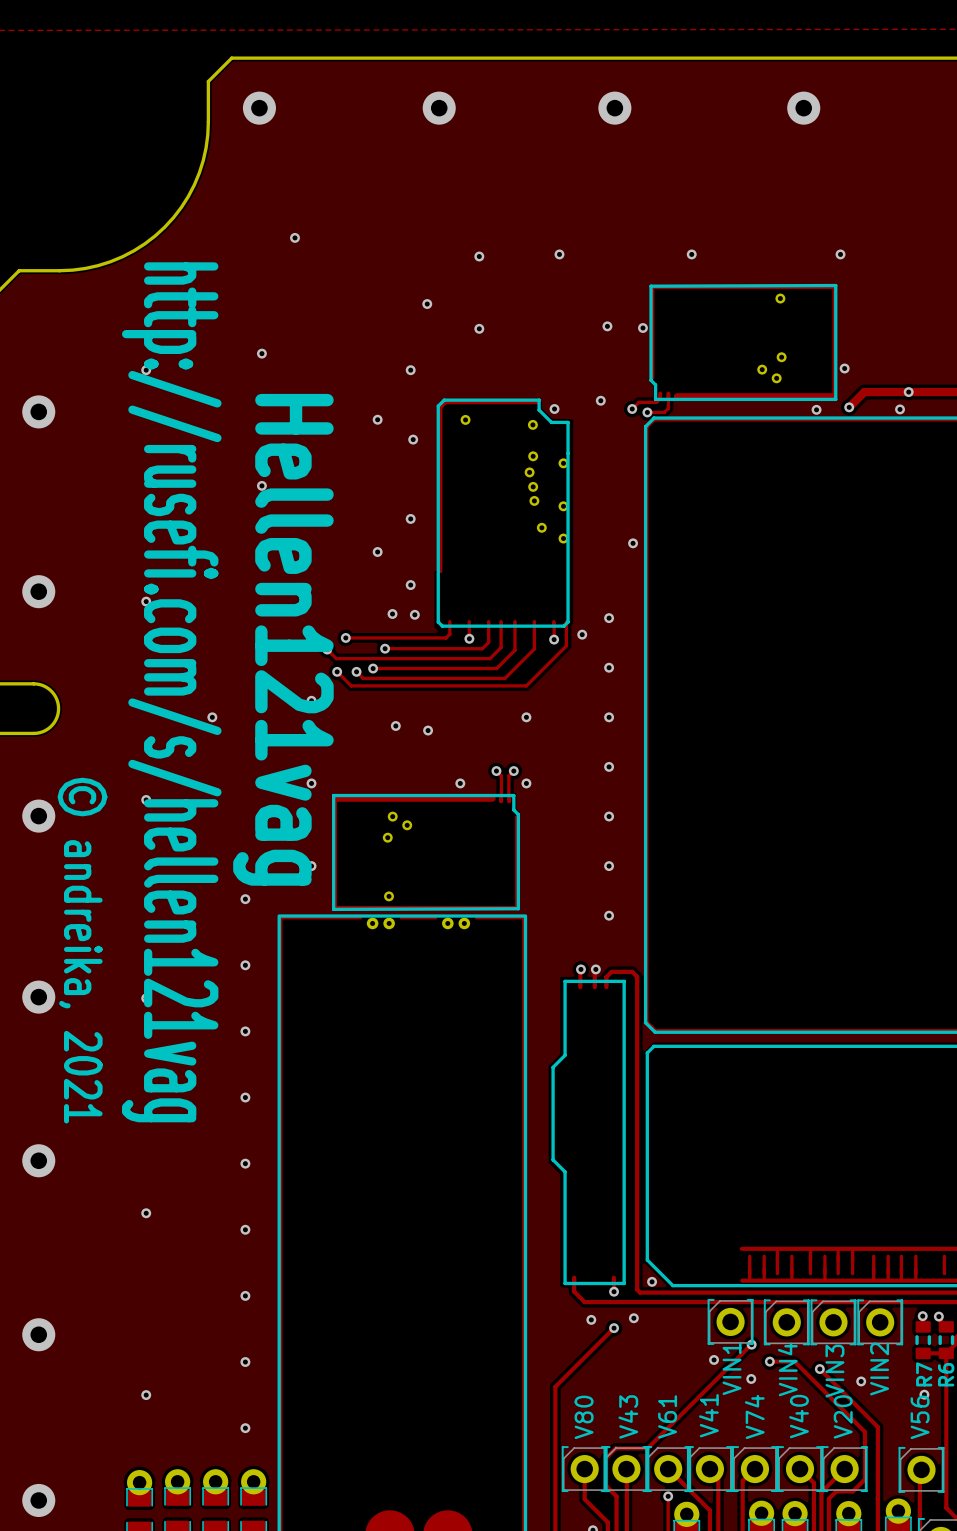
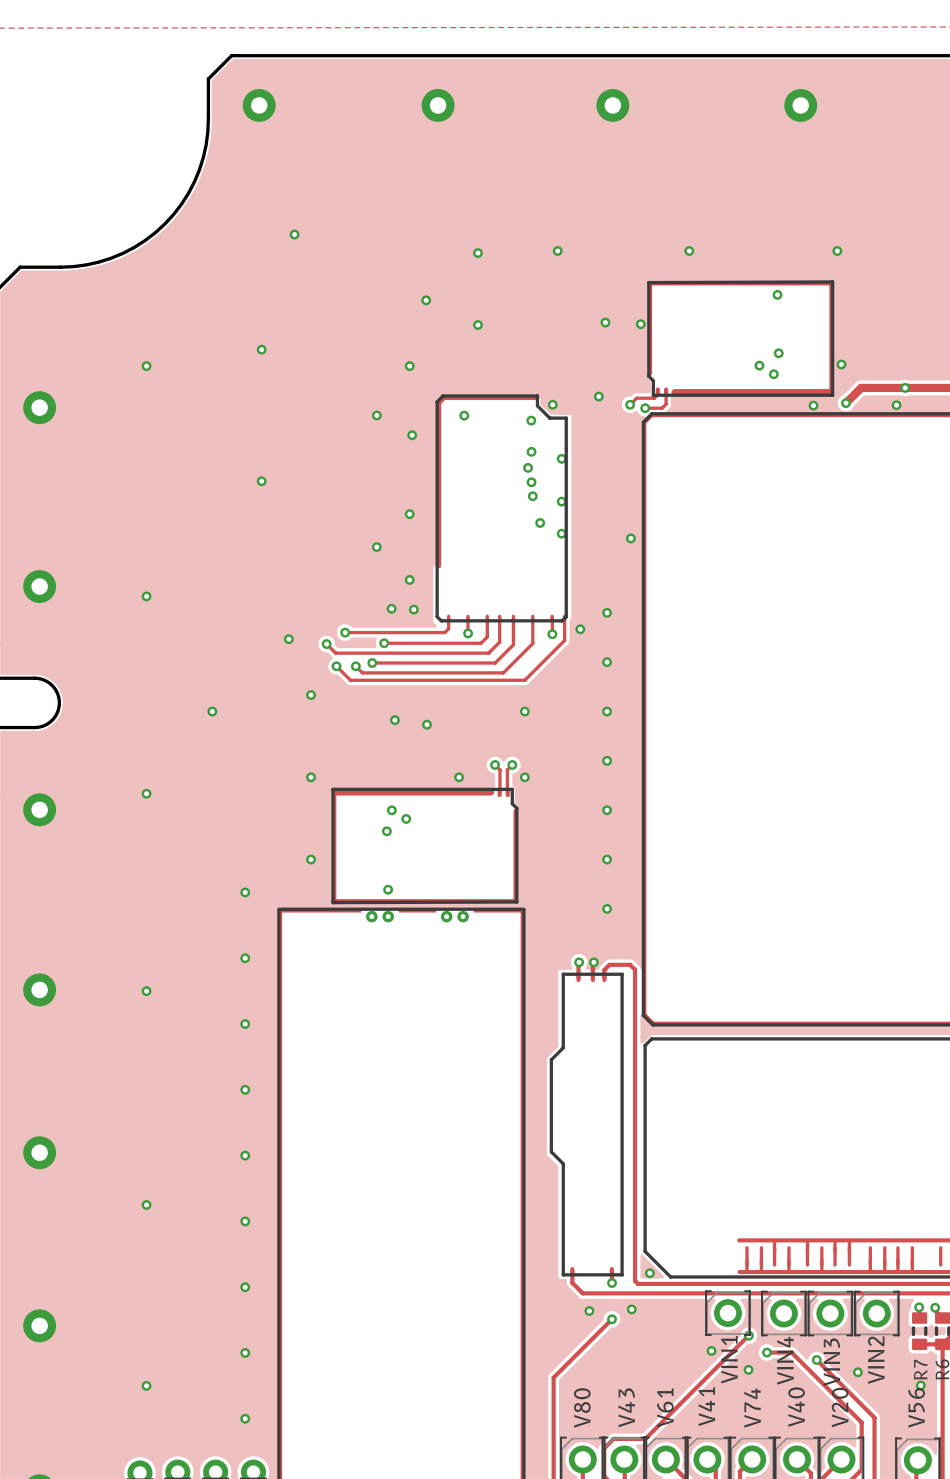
text: Hellen121vag (283, 639) -> none
text: http://rusefi.com/s/hellen121vag (171, 692) -> none
text: © andreika, 2021 (82, 950) -> none

